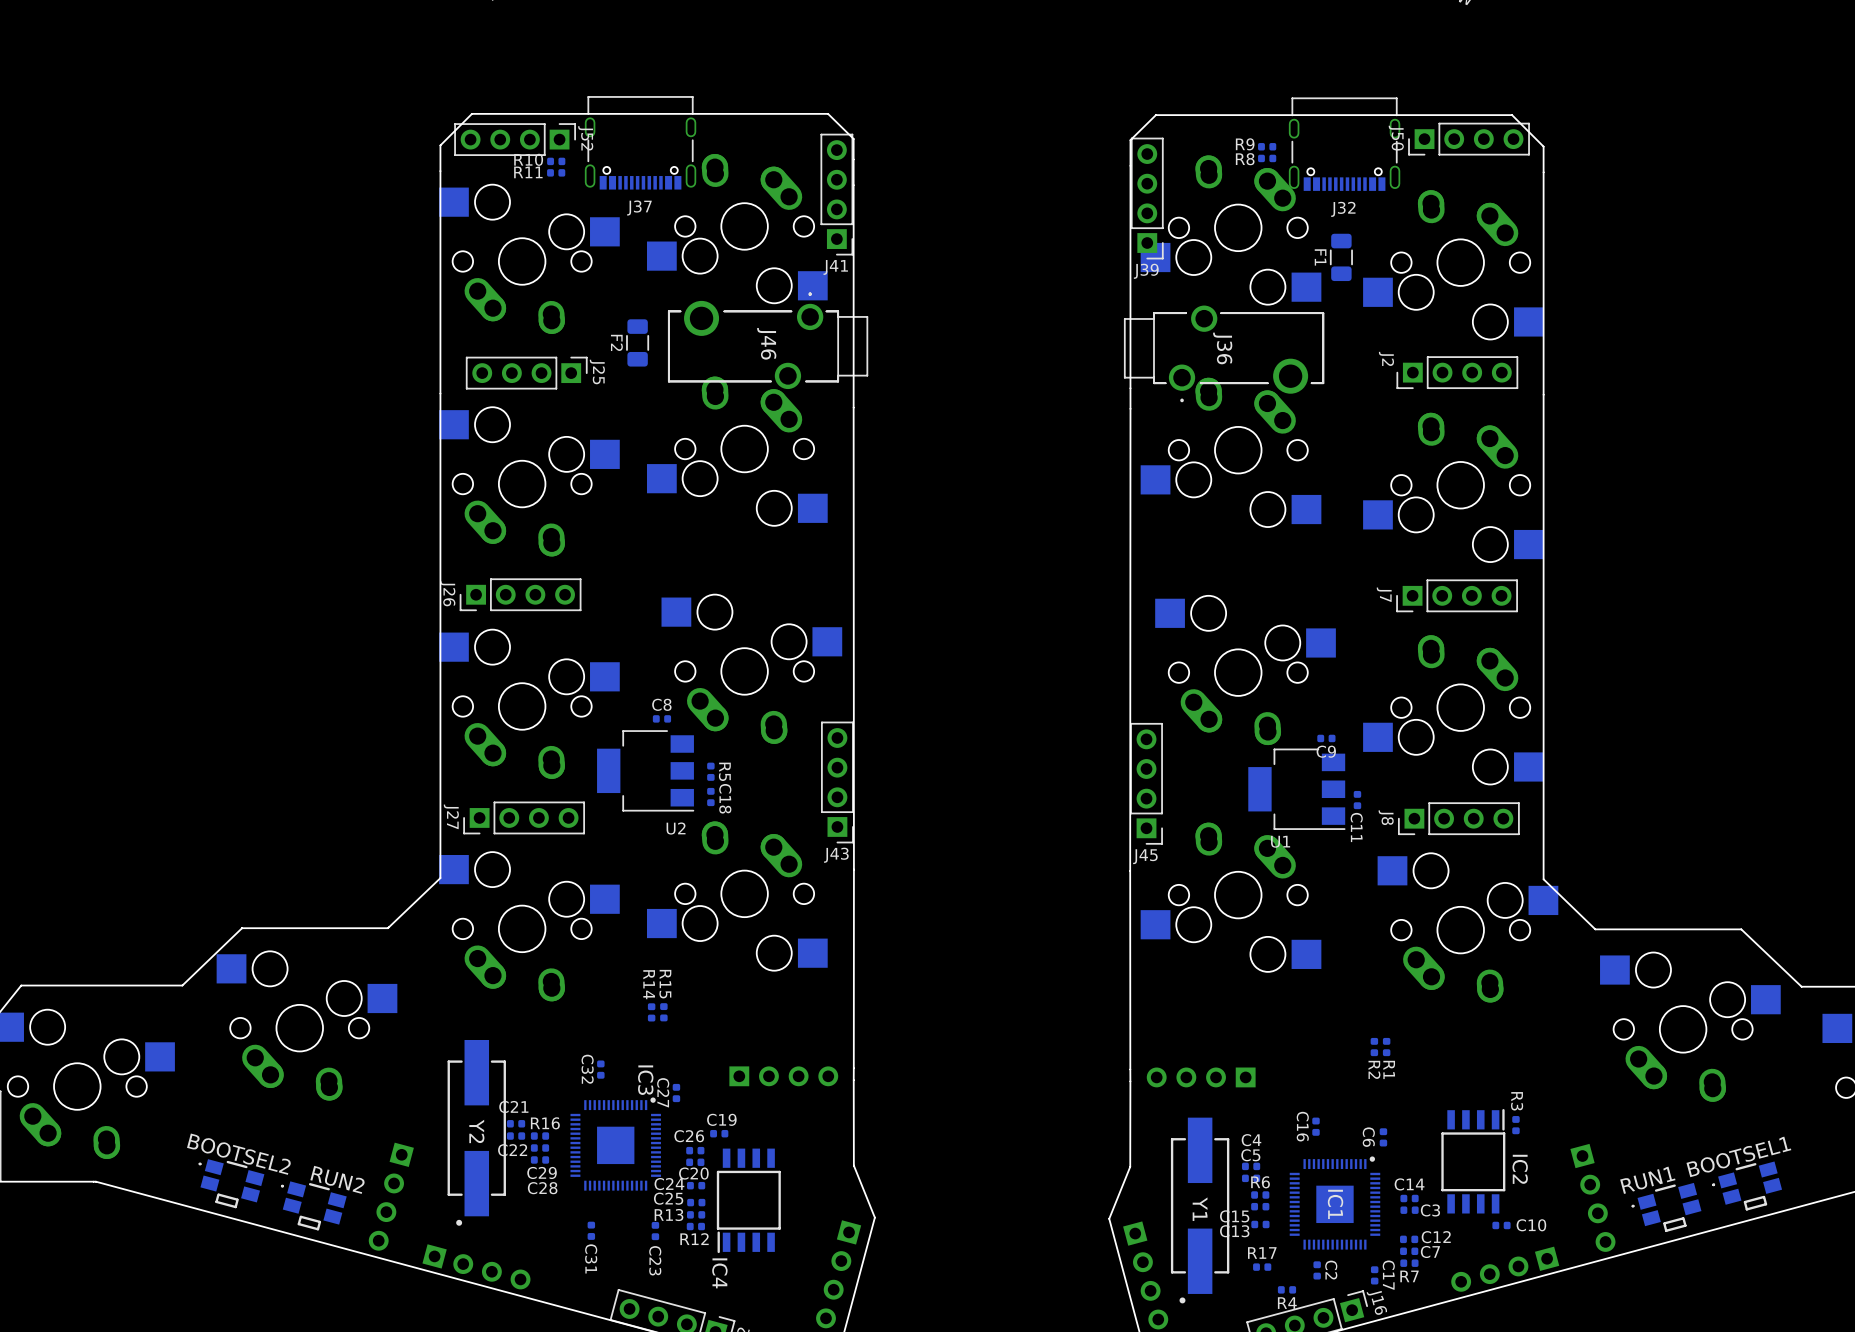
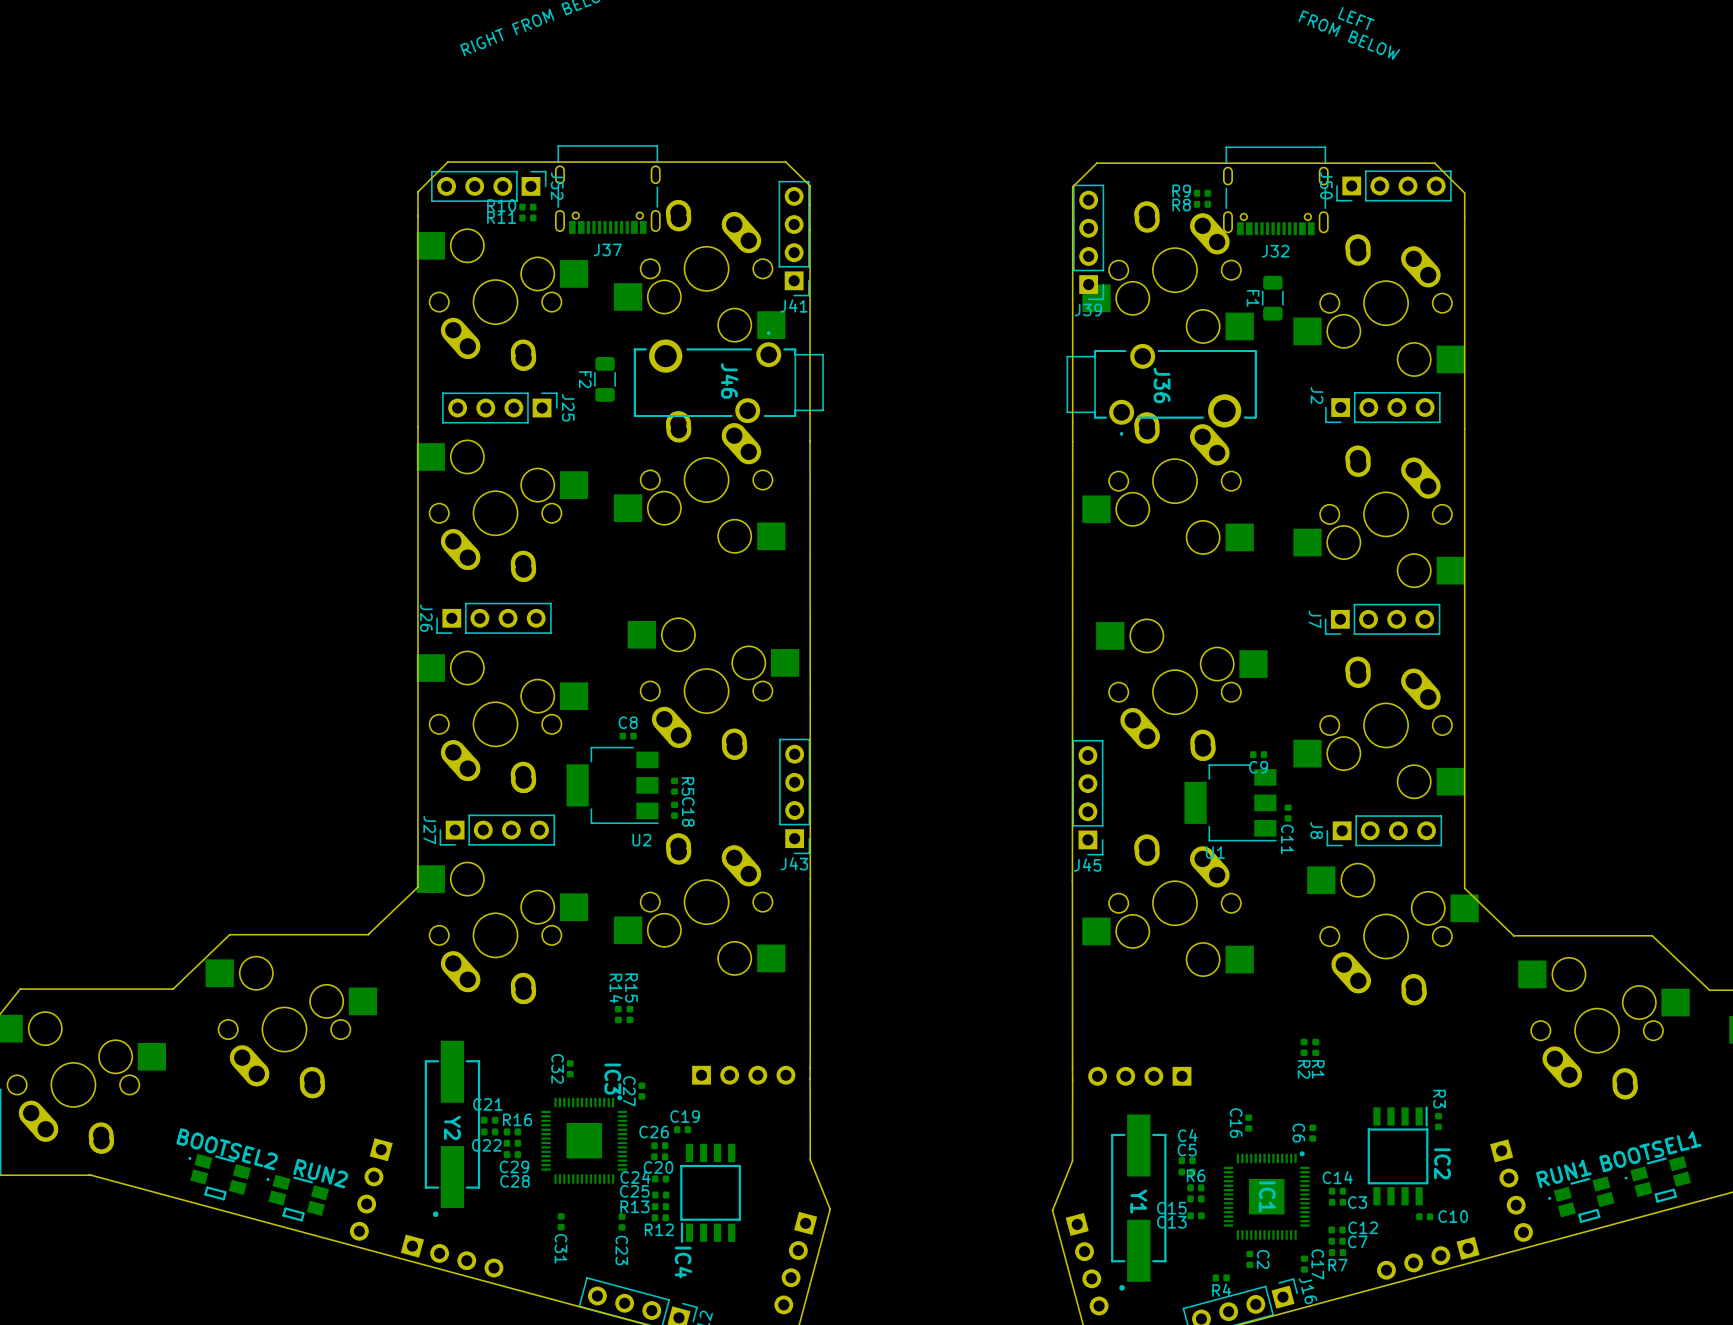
R17: (1262, 1267) -> none

